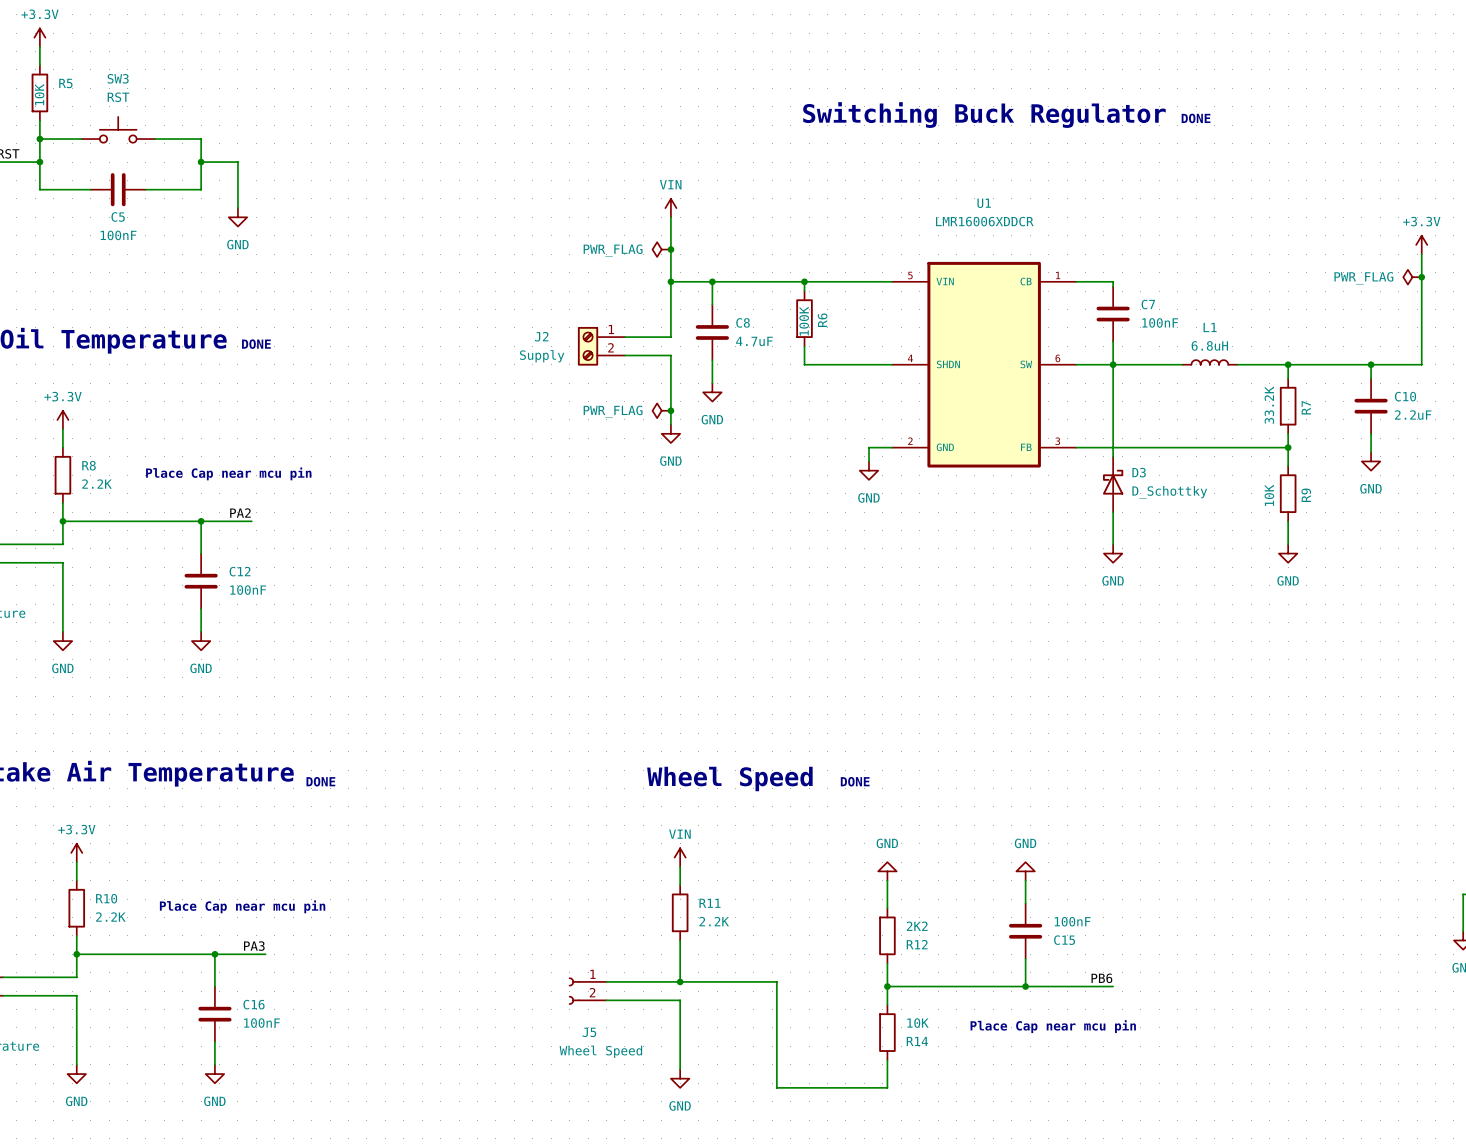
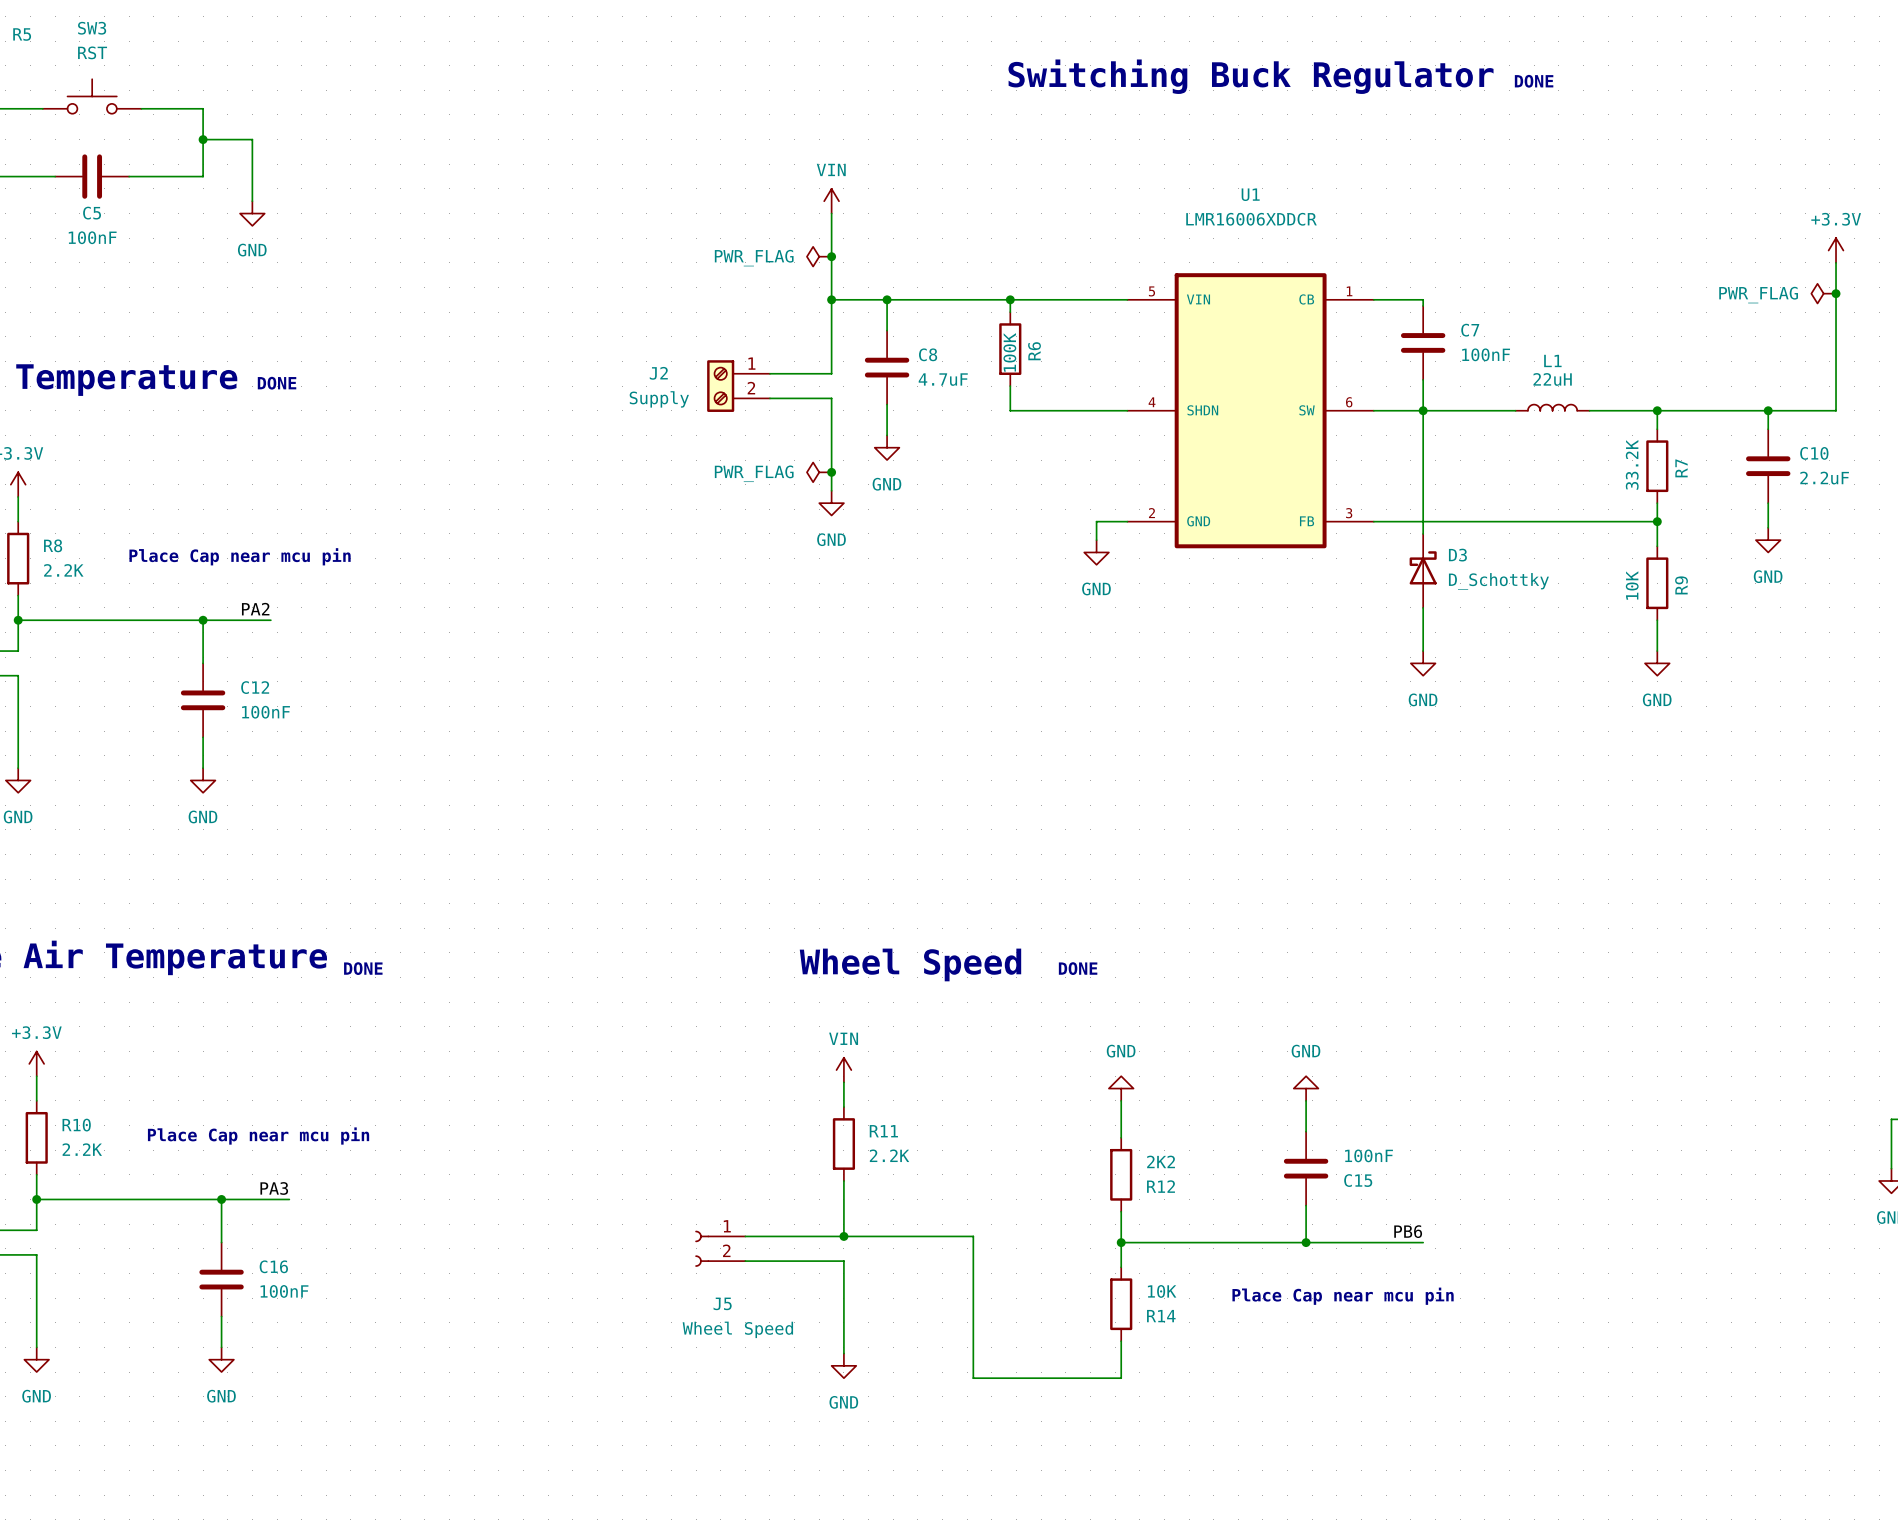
L1 value: 6.8uH (1209, 345) -> 22uH (1552, 379)

